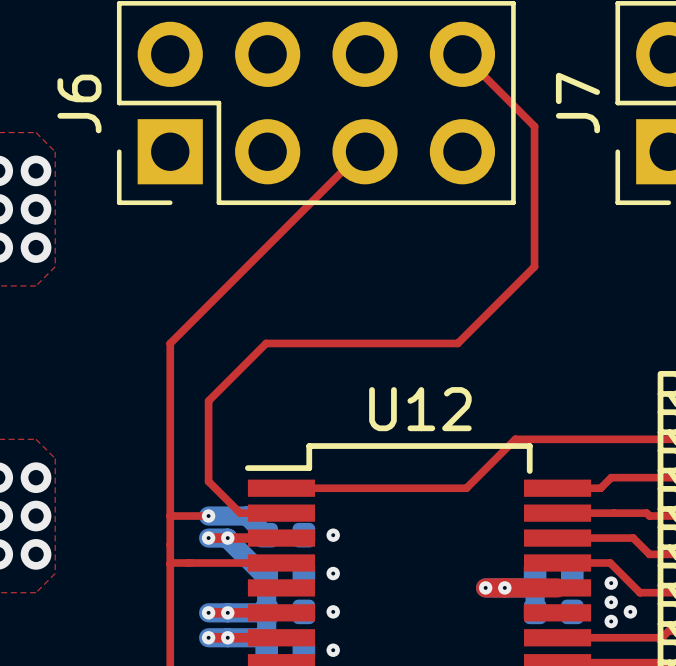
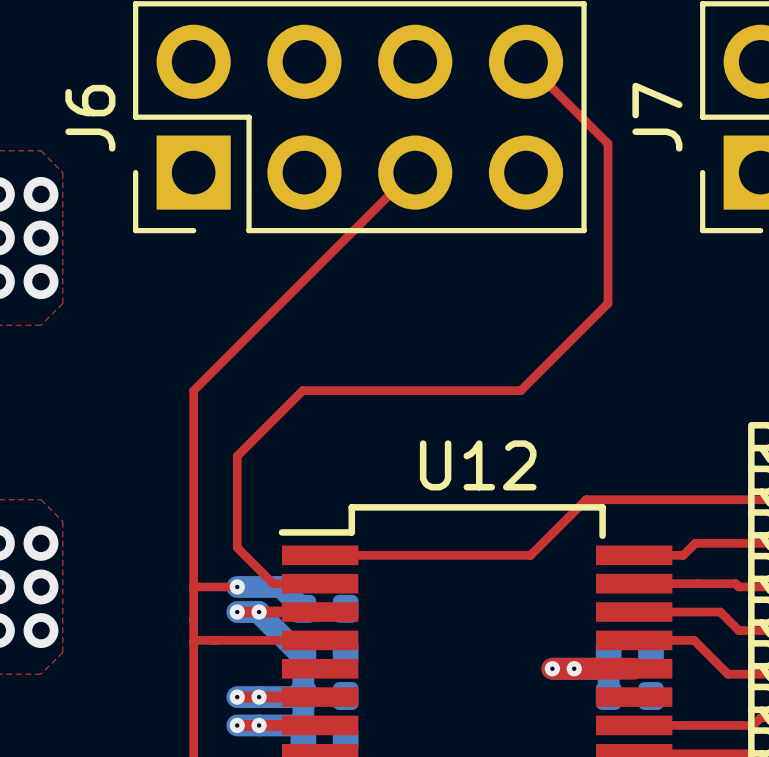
via: (333, 535) -> none
via: (333, 573) -> none
via: (611, 583) -> none
via: (611, 602) -> none
via: (333, 611) -> none
via: (630, 611) -> none
via: (611, 621) -> none
via: (333, 650) -> none

